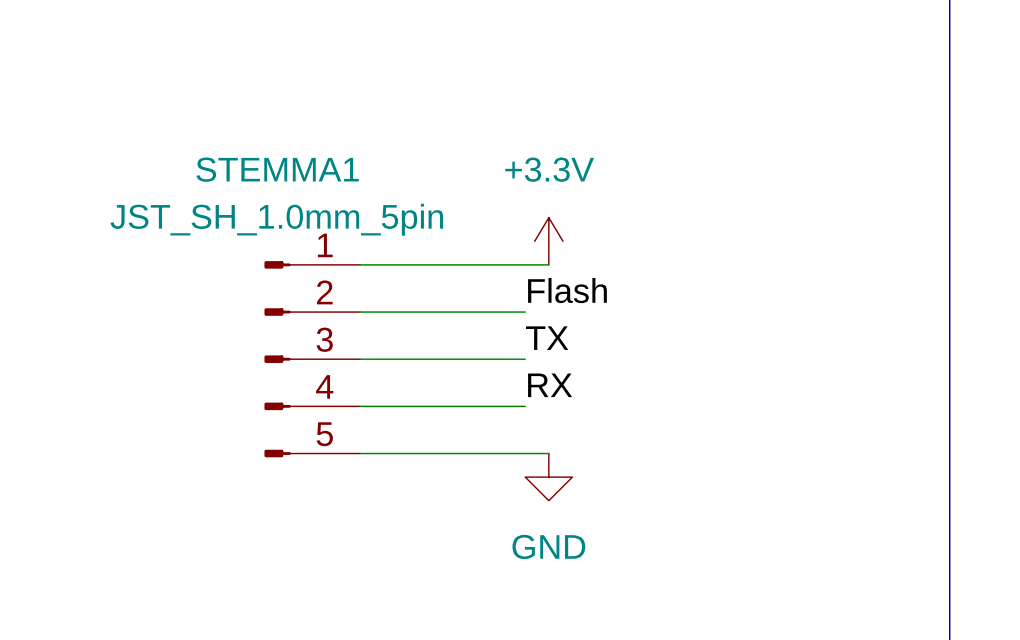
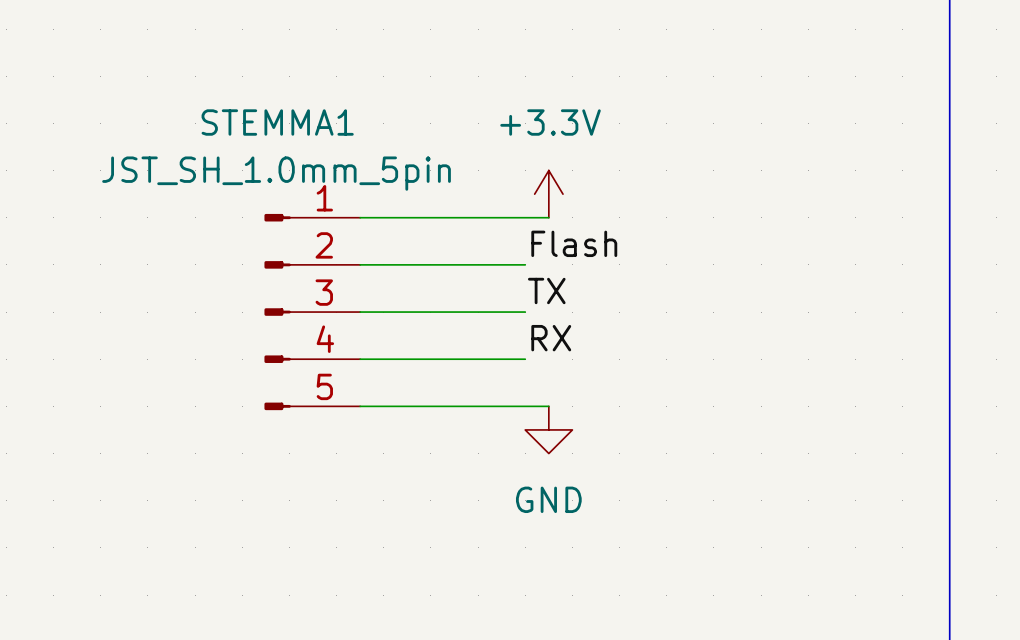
power symbol position: +3.3V (548, 241) -> +3.3V (548, 194)
label: none -> Flash (574, 243)
wire: (525, 264) (548, 264) -> (525, 406) (548, 406)
label: Flash (567, 290) -> TX (546, 291)
label: TX (547, 338) -> RX (551, 338)
STEMMA1 position: (312, 359) -> (312, 312)
label: RX (550, 385) -> none
wire: (360, 453) (548, 453) -> (360, 217) (548, 217)
power symbol position: GND (548, 477) -> GND (548, 429)

